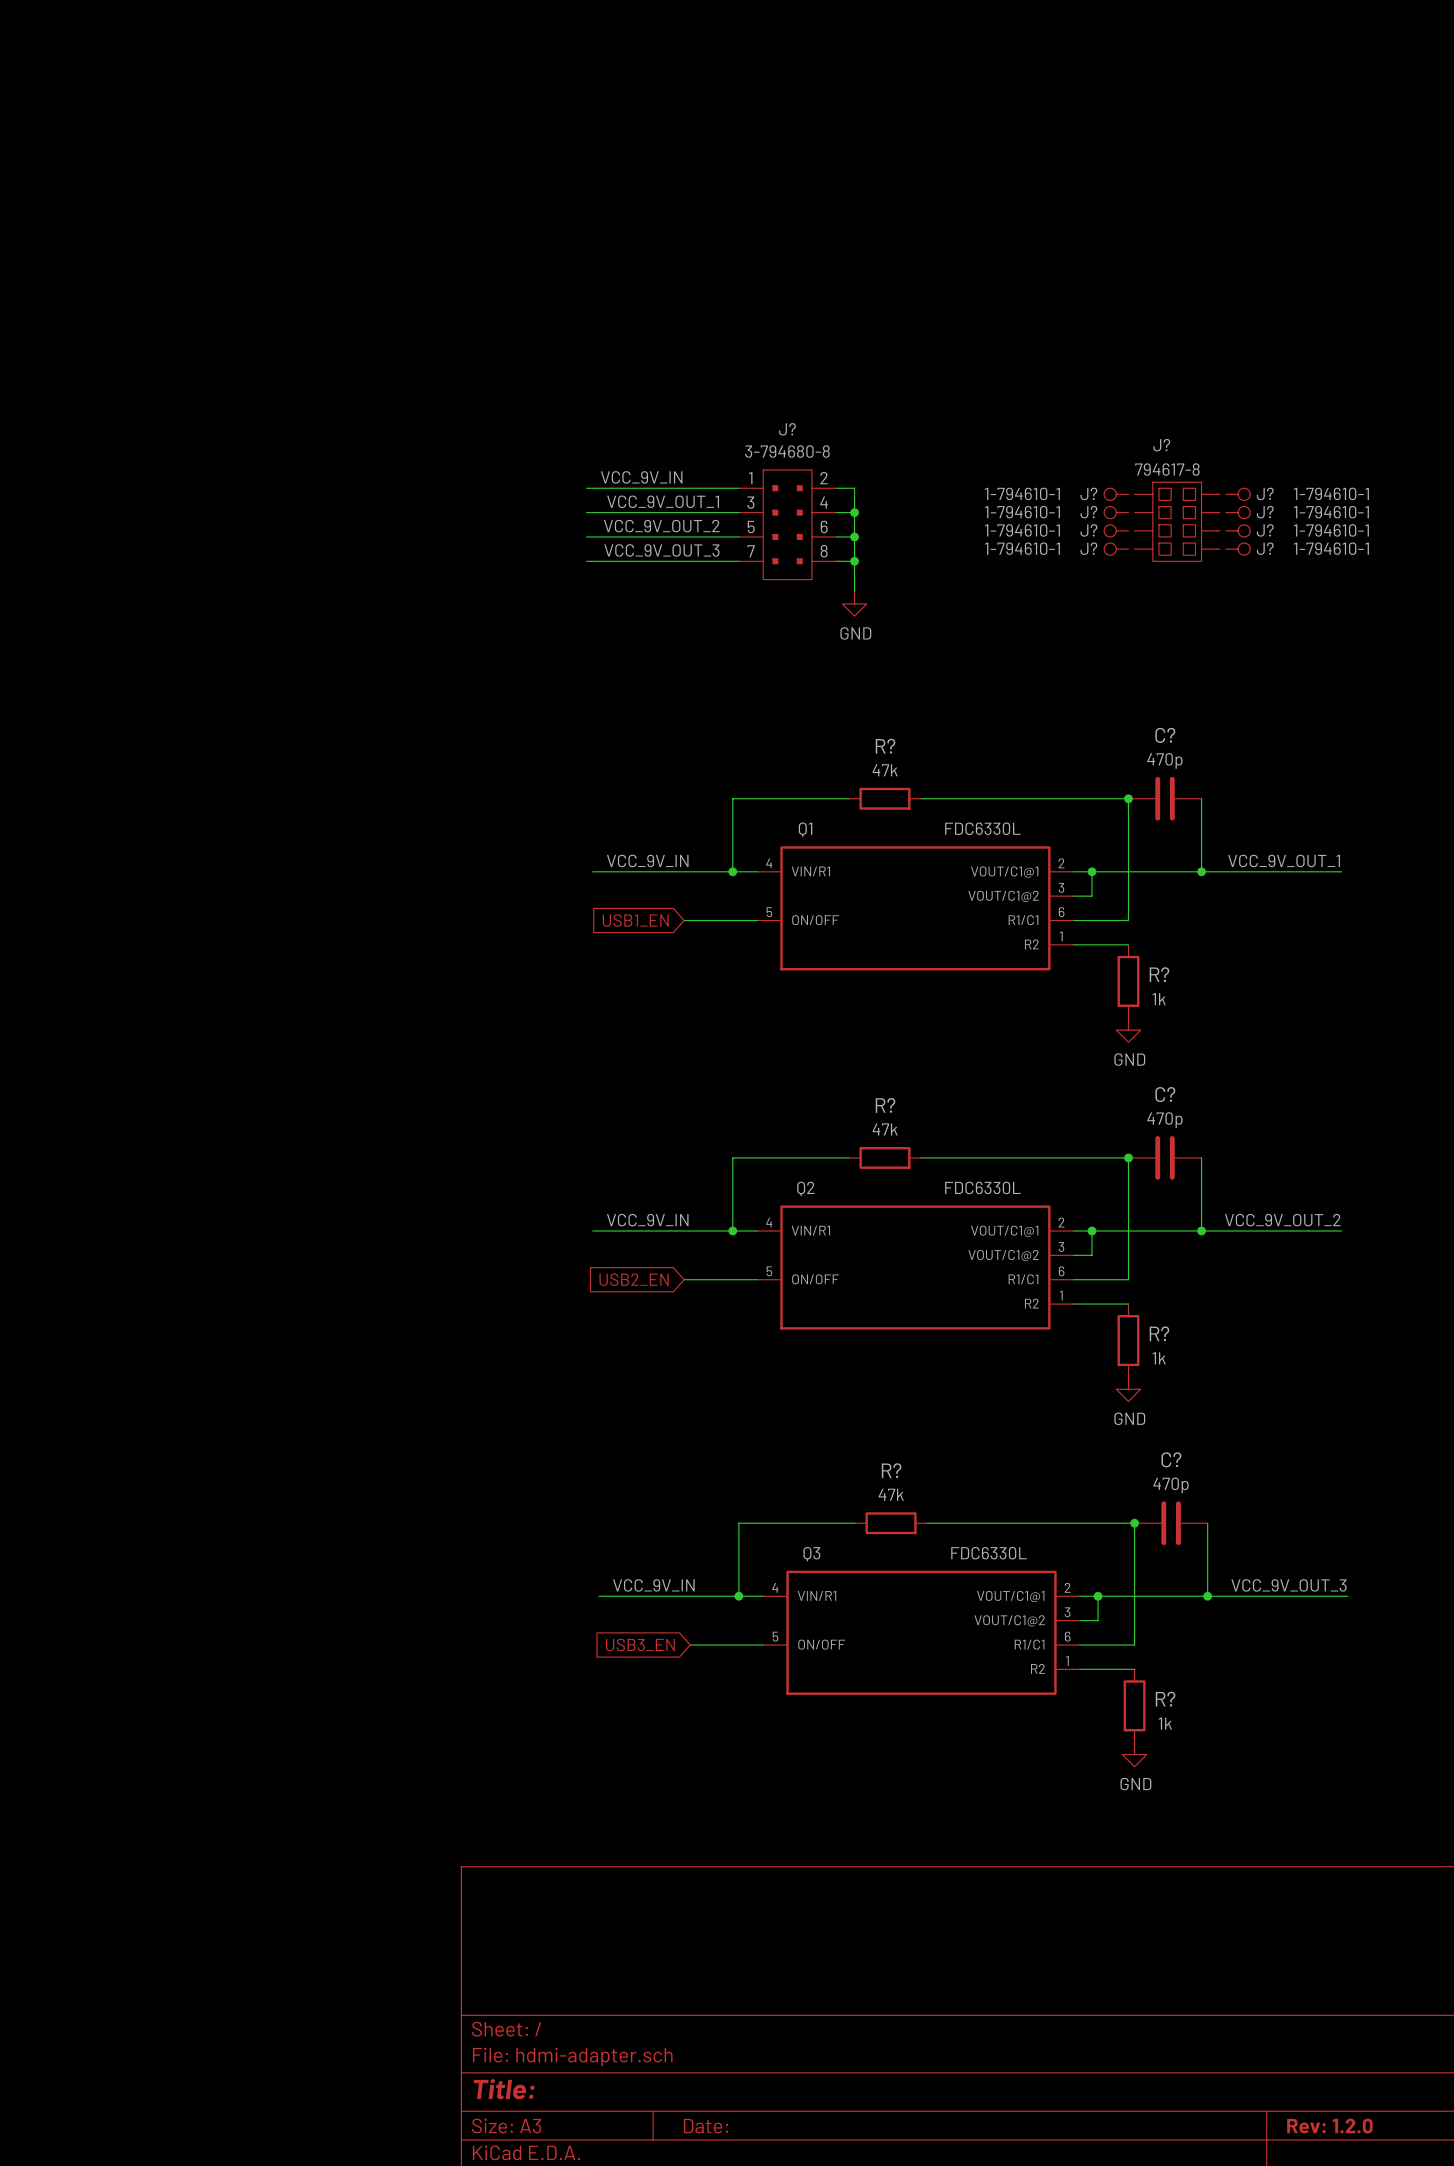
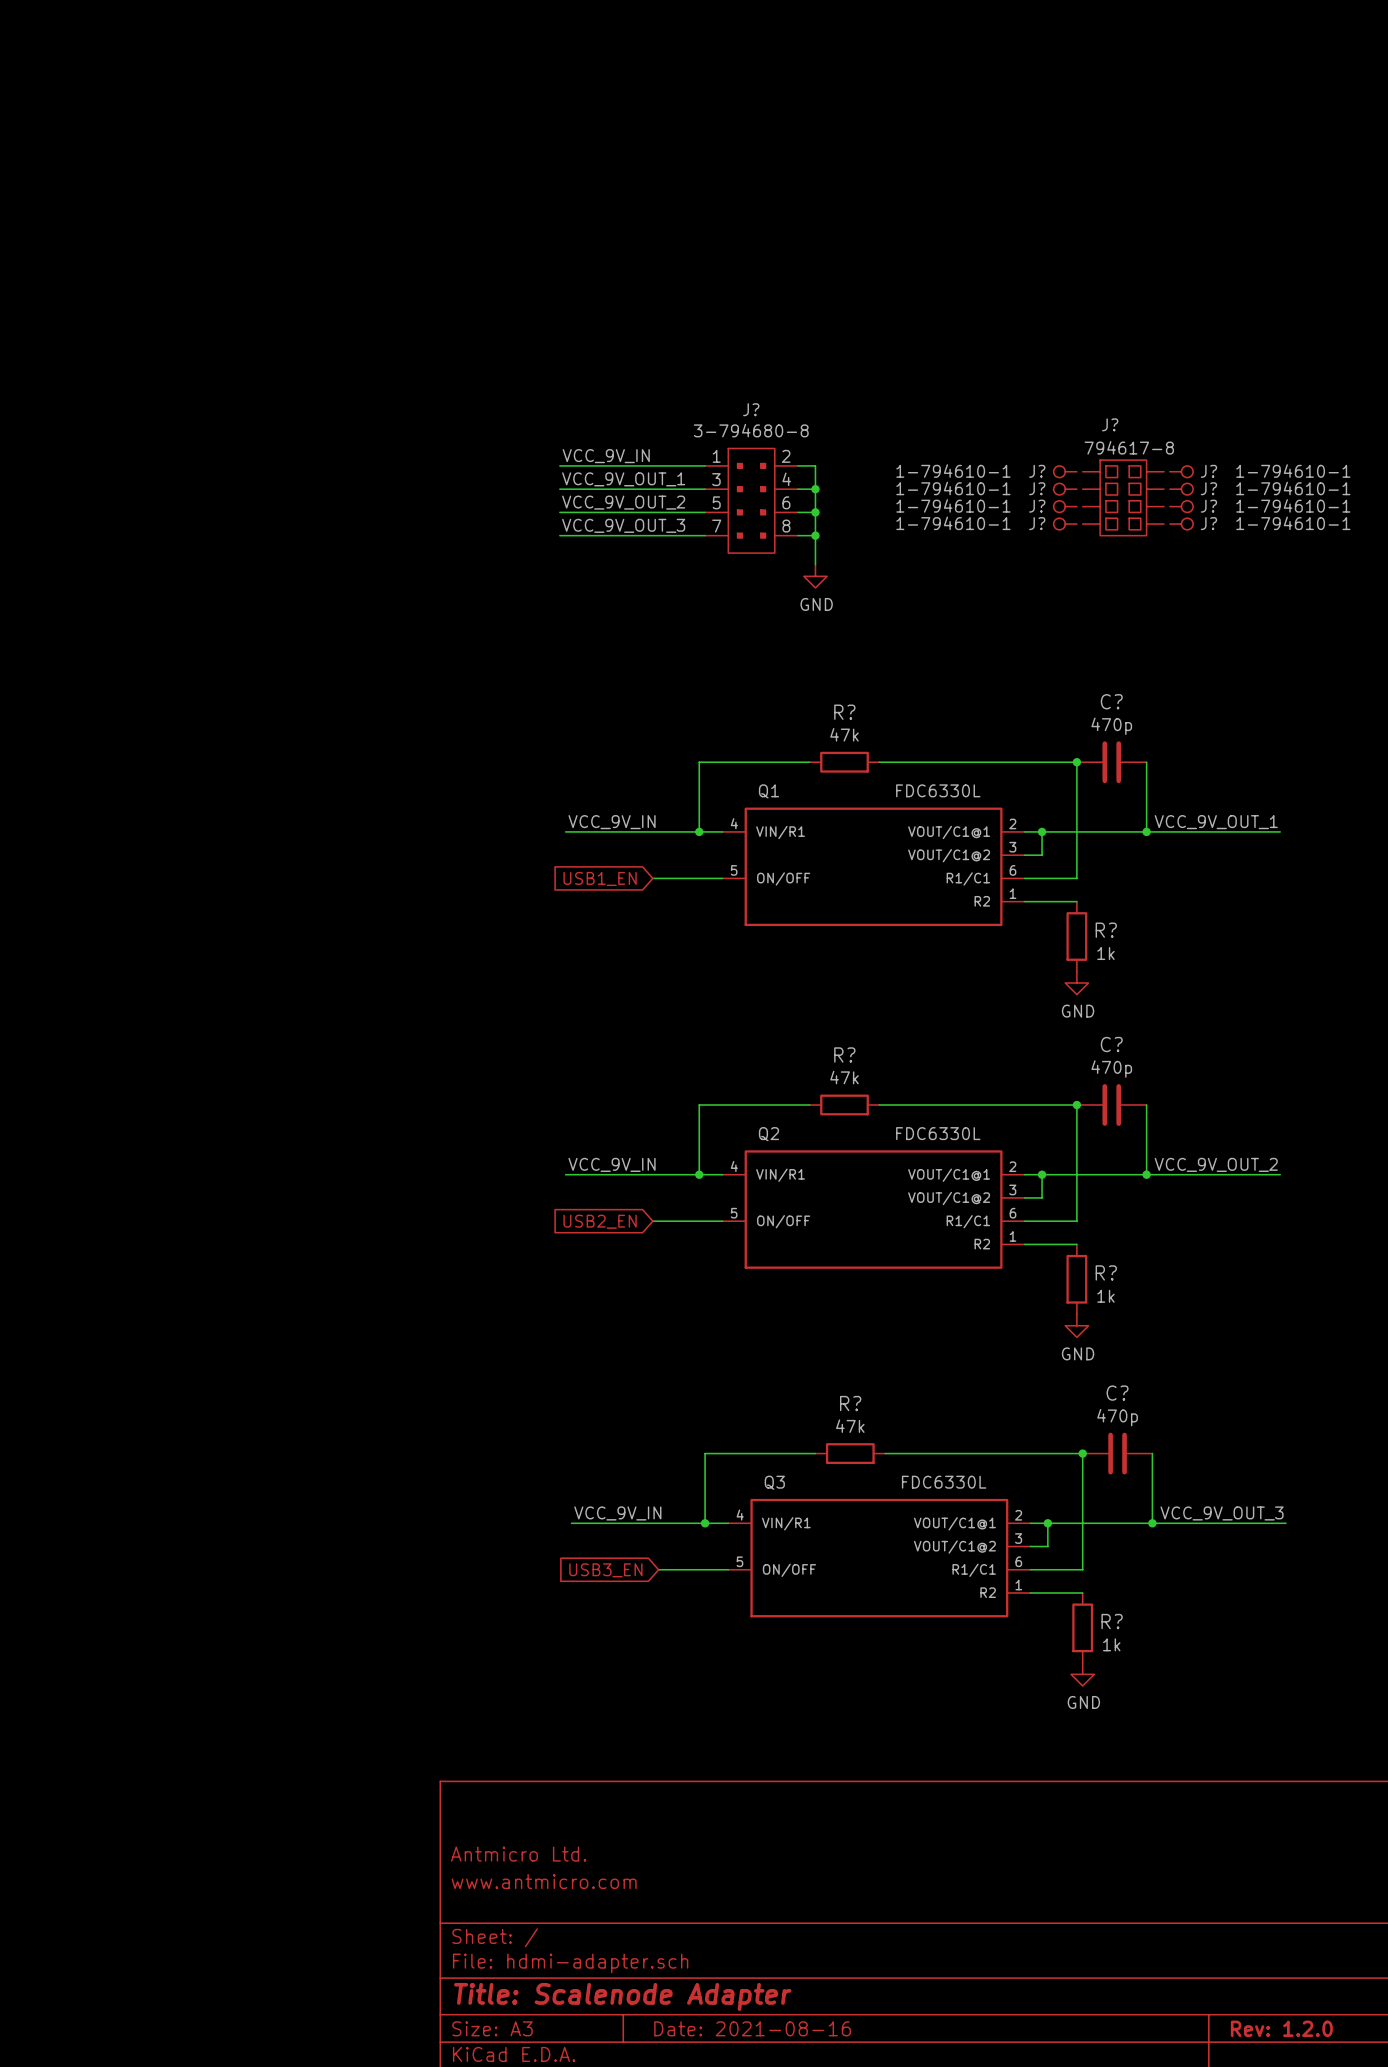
title block: none -> Antmicro Ltd. (518, 1854)
title block: none -> www.antmicro.com (544, 1881)
title block: Title: (504, 2089) -> Title: Scalenode Adapter (622, 1996)
title block: Date: (705, 2126) -> Date: 2021-08-16 (752, 2028)

